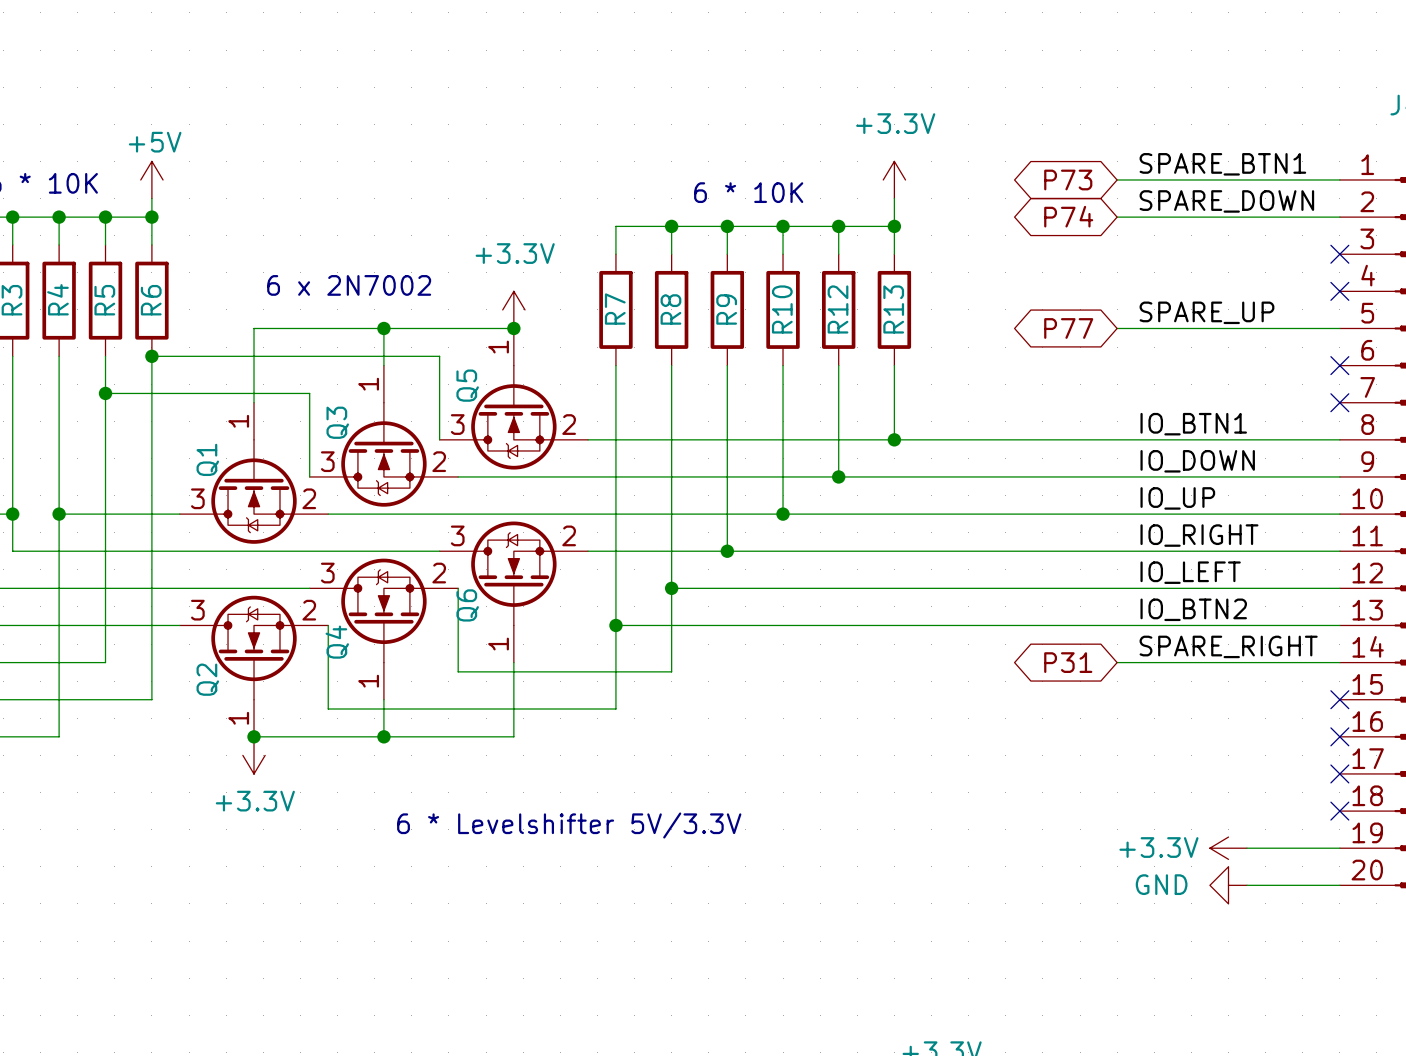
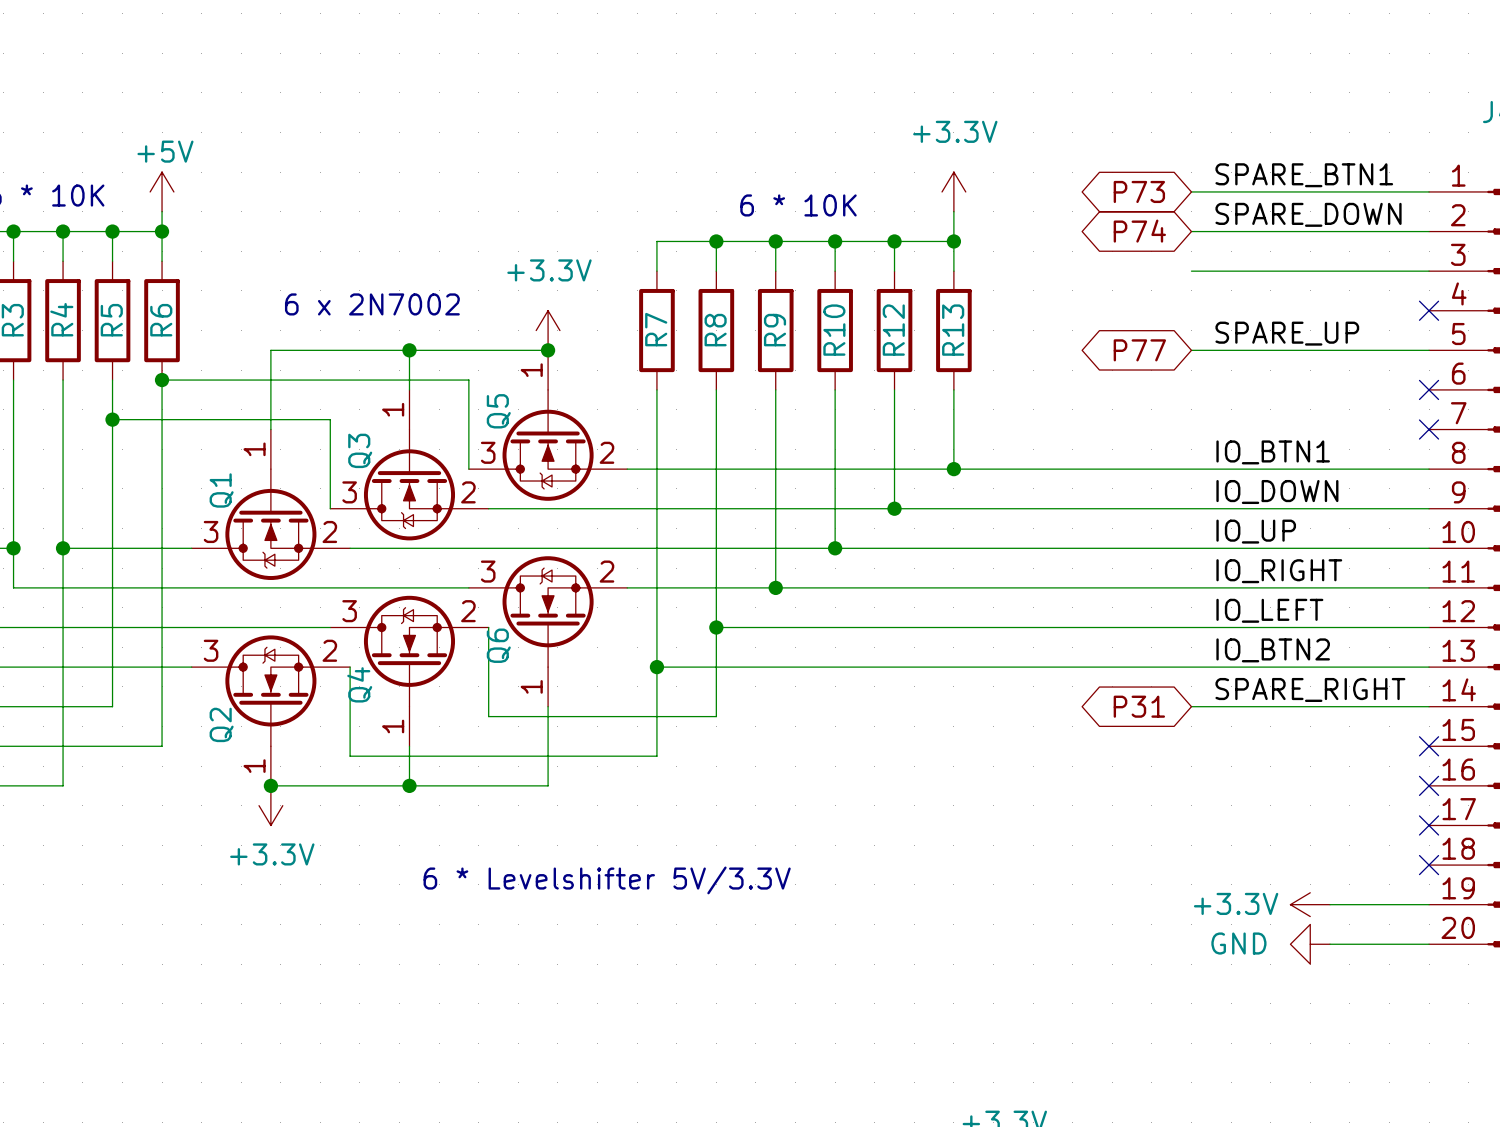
wire: none -> (1191, 271) (1429, 271)
no-connect mark: (1339, 254) -> none

